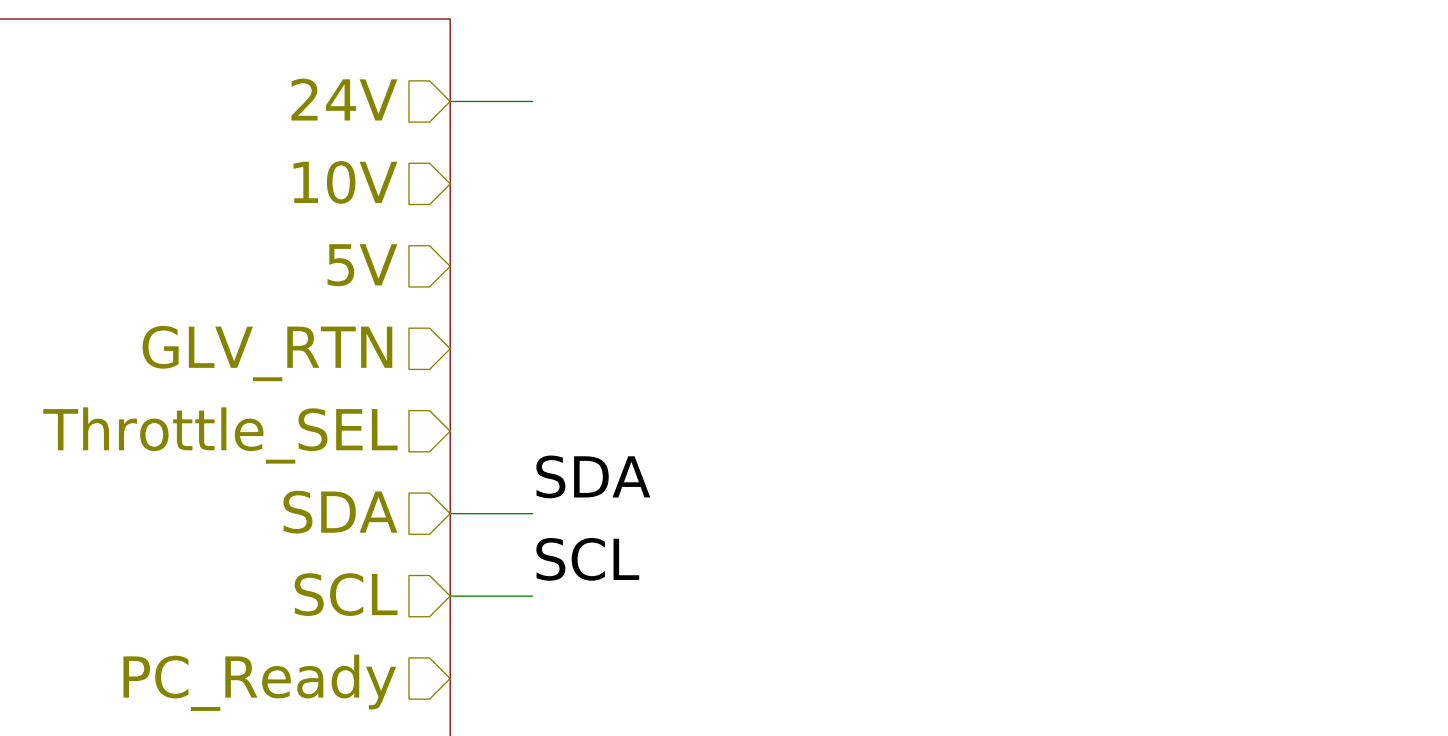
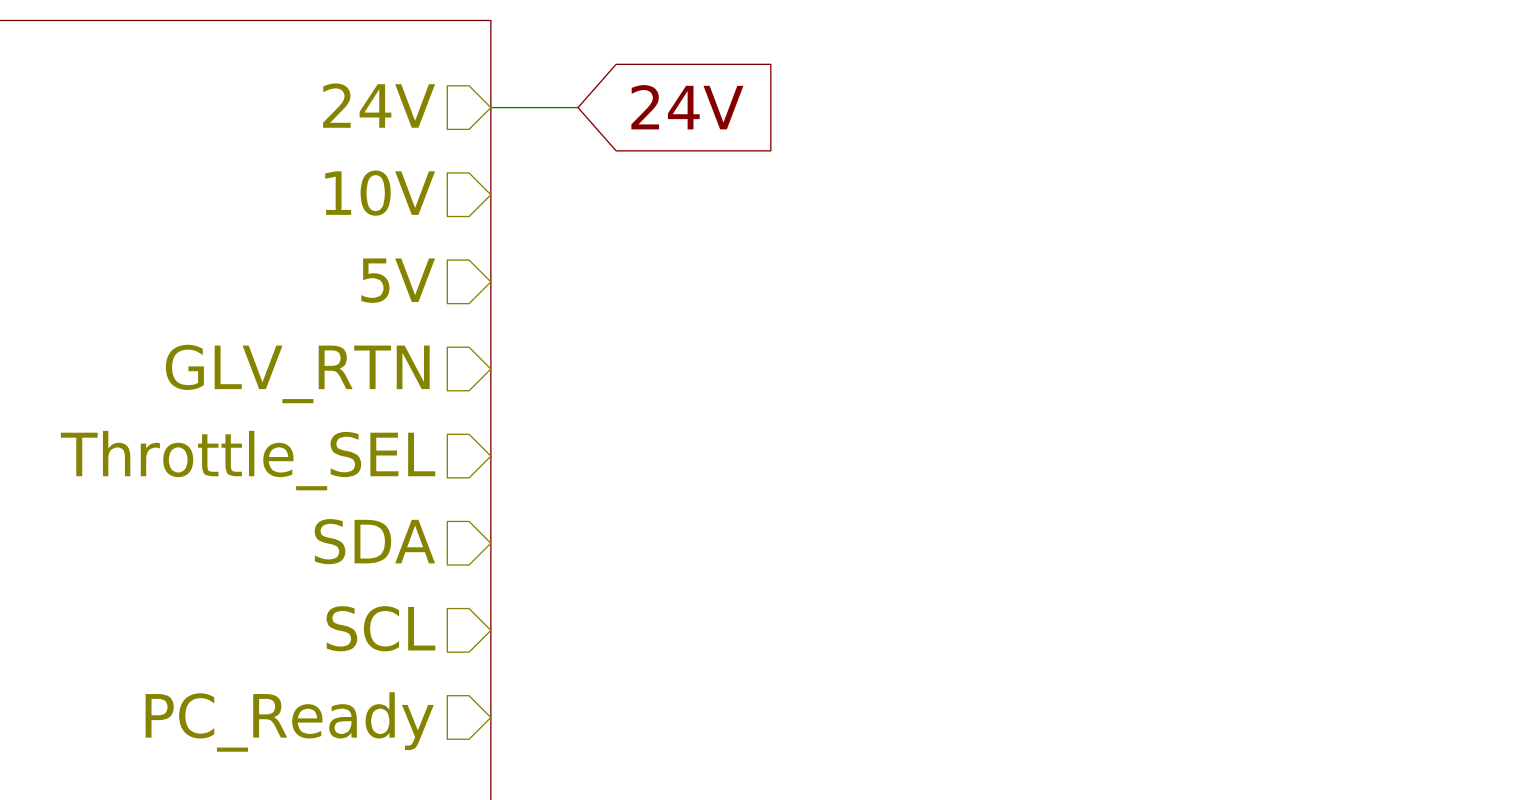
global label: none -> 24V (687, 107)
label: SDA (593, 476) -> none
wire: (450, 513) (532, 513) -> none
label: SCL (587, 559) -> none
wire: (450, 596) (532, 596) -> none

